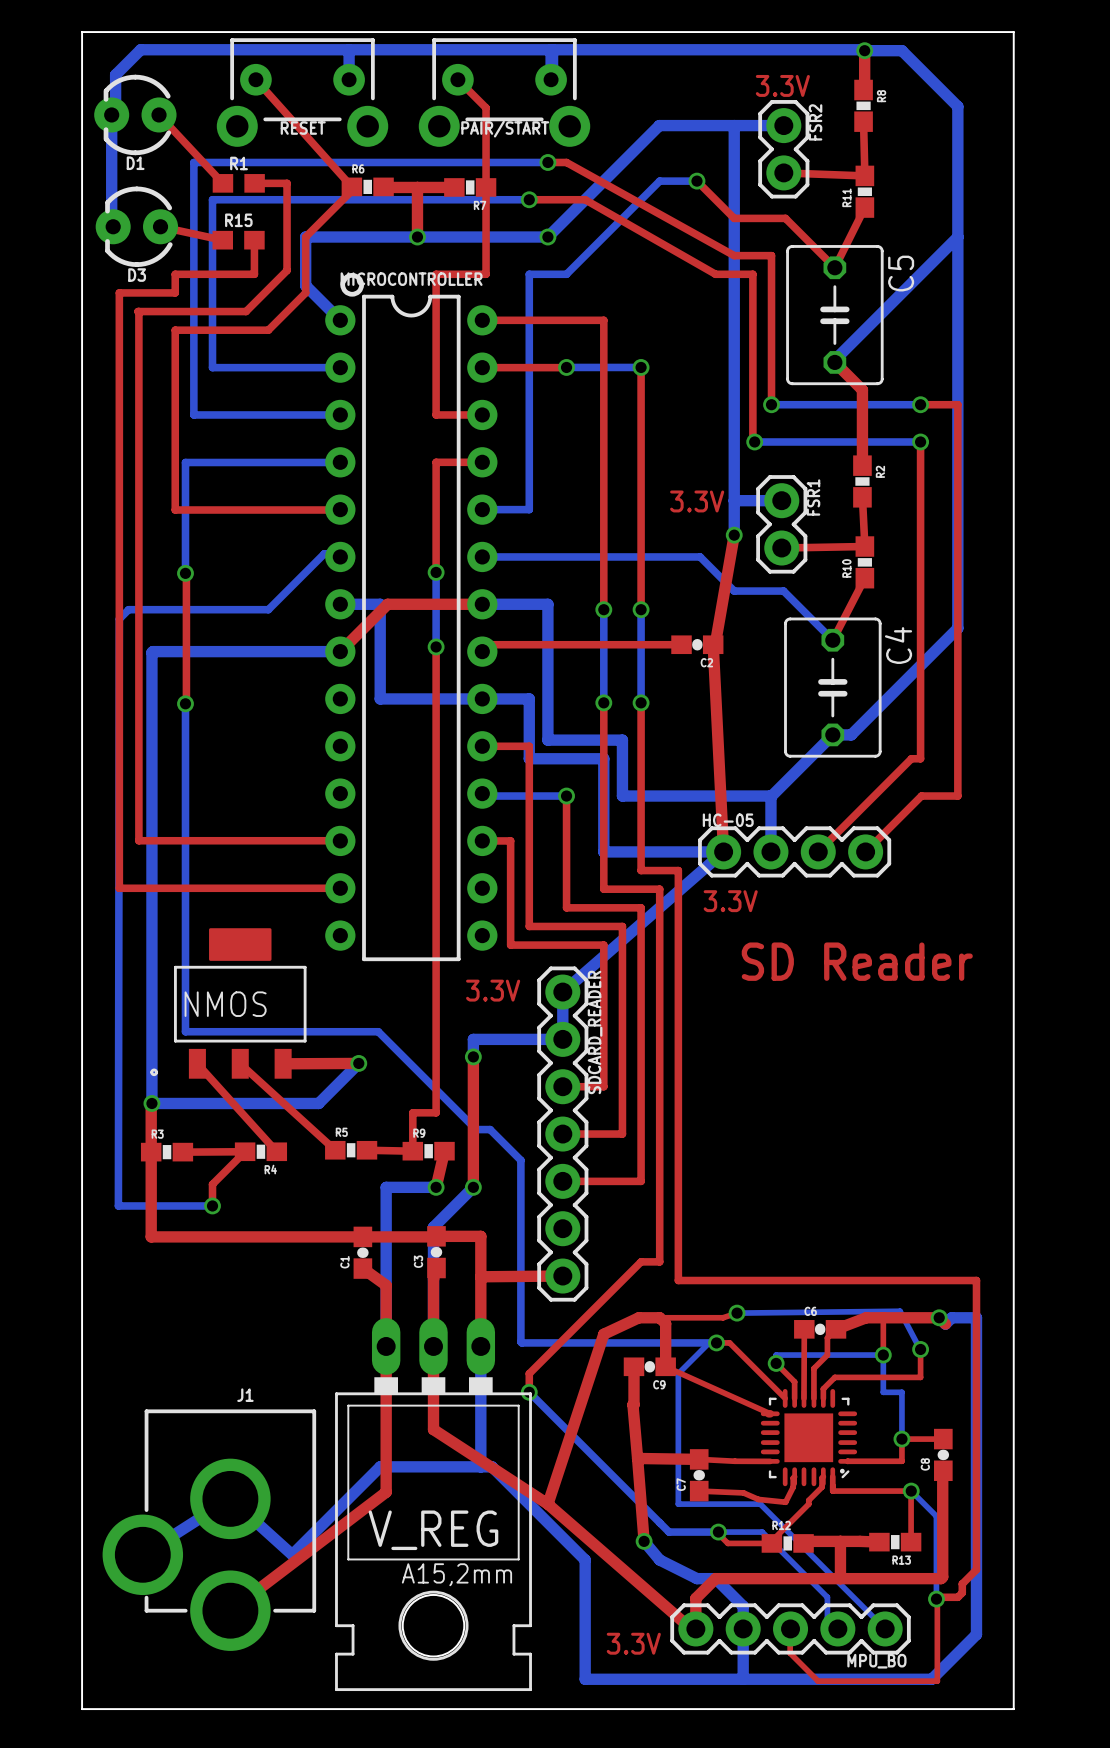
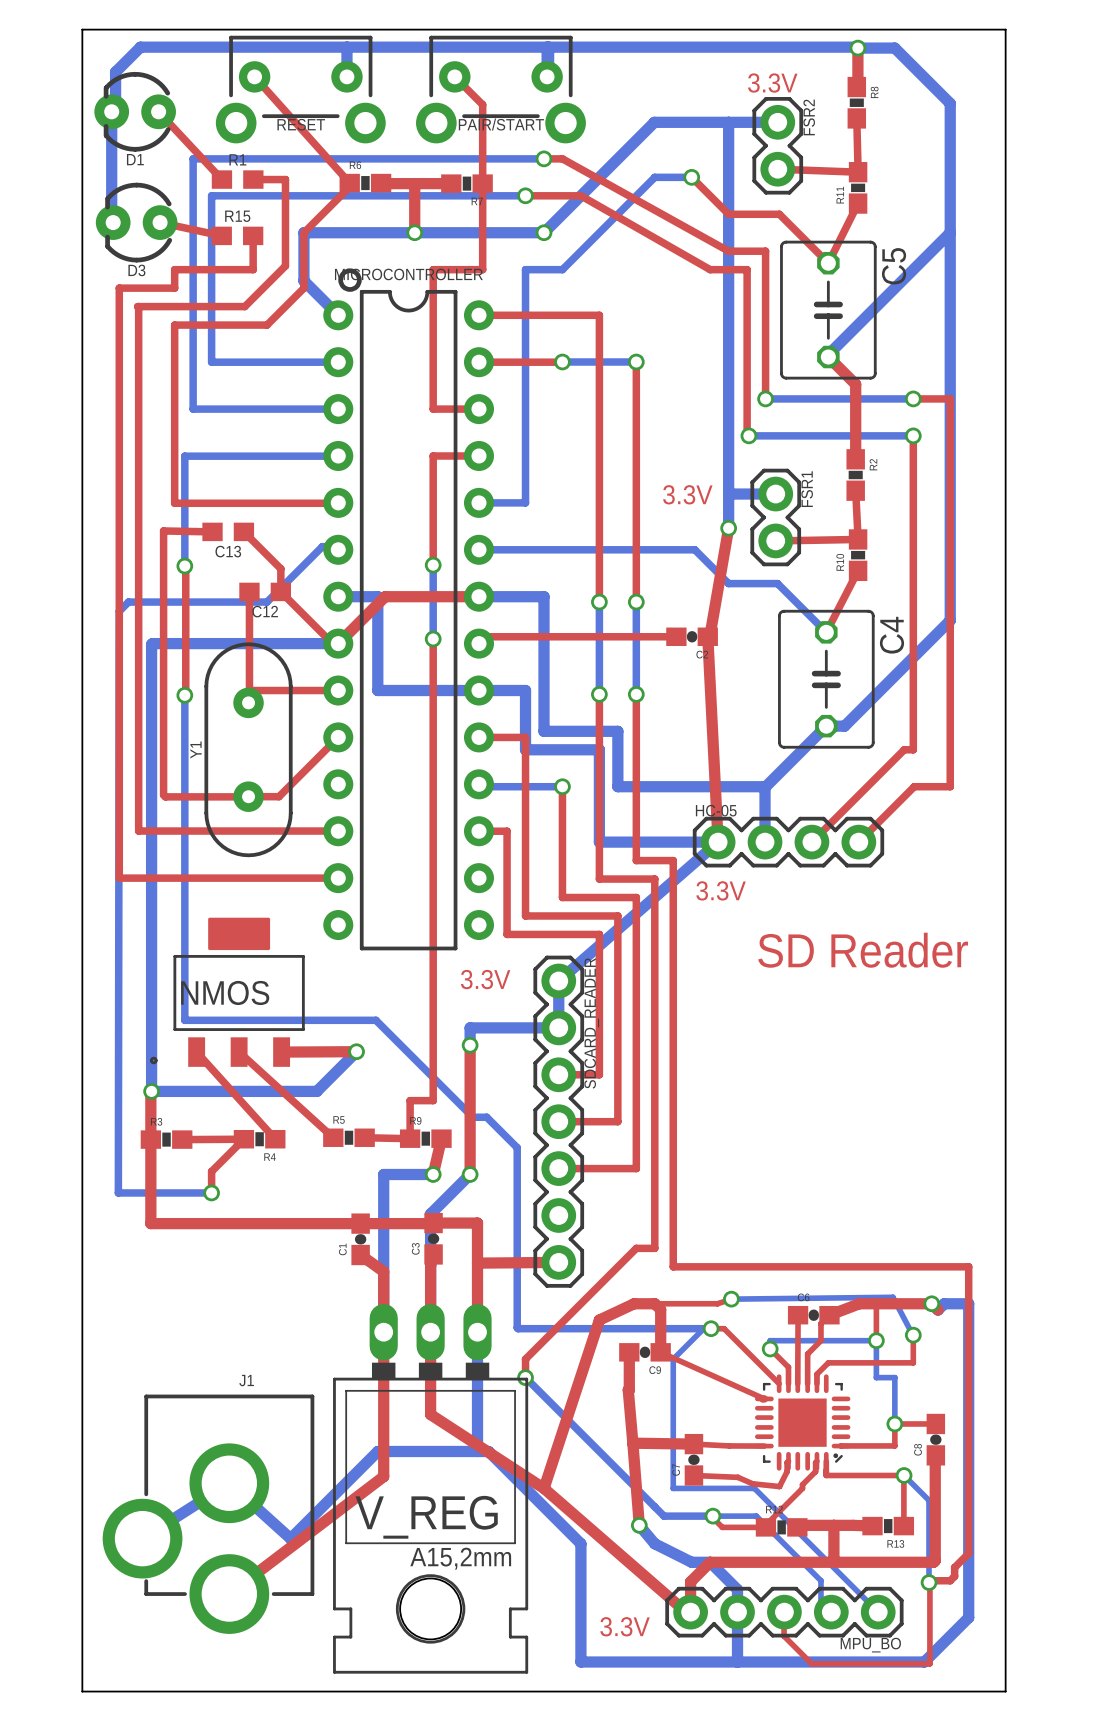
top track: none -> (212, 531) (163, 530) (163, 795) (165, 796) (248, 796)
C13: none -> (228, 531)
top track: none -> (243, 531) (280, 568) (280, 591) (332, 643) (338, 643)
top track: none -> (249, 591) (249, 701) (248, 702) (248, 690) (338, 690)
C12: none -> (265, 591)
top track: none -> (338, 737) (279, 796) (248, 796)
Y1: none -> (248, 749)

